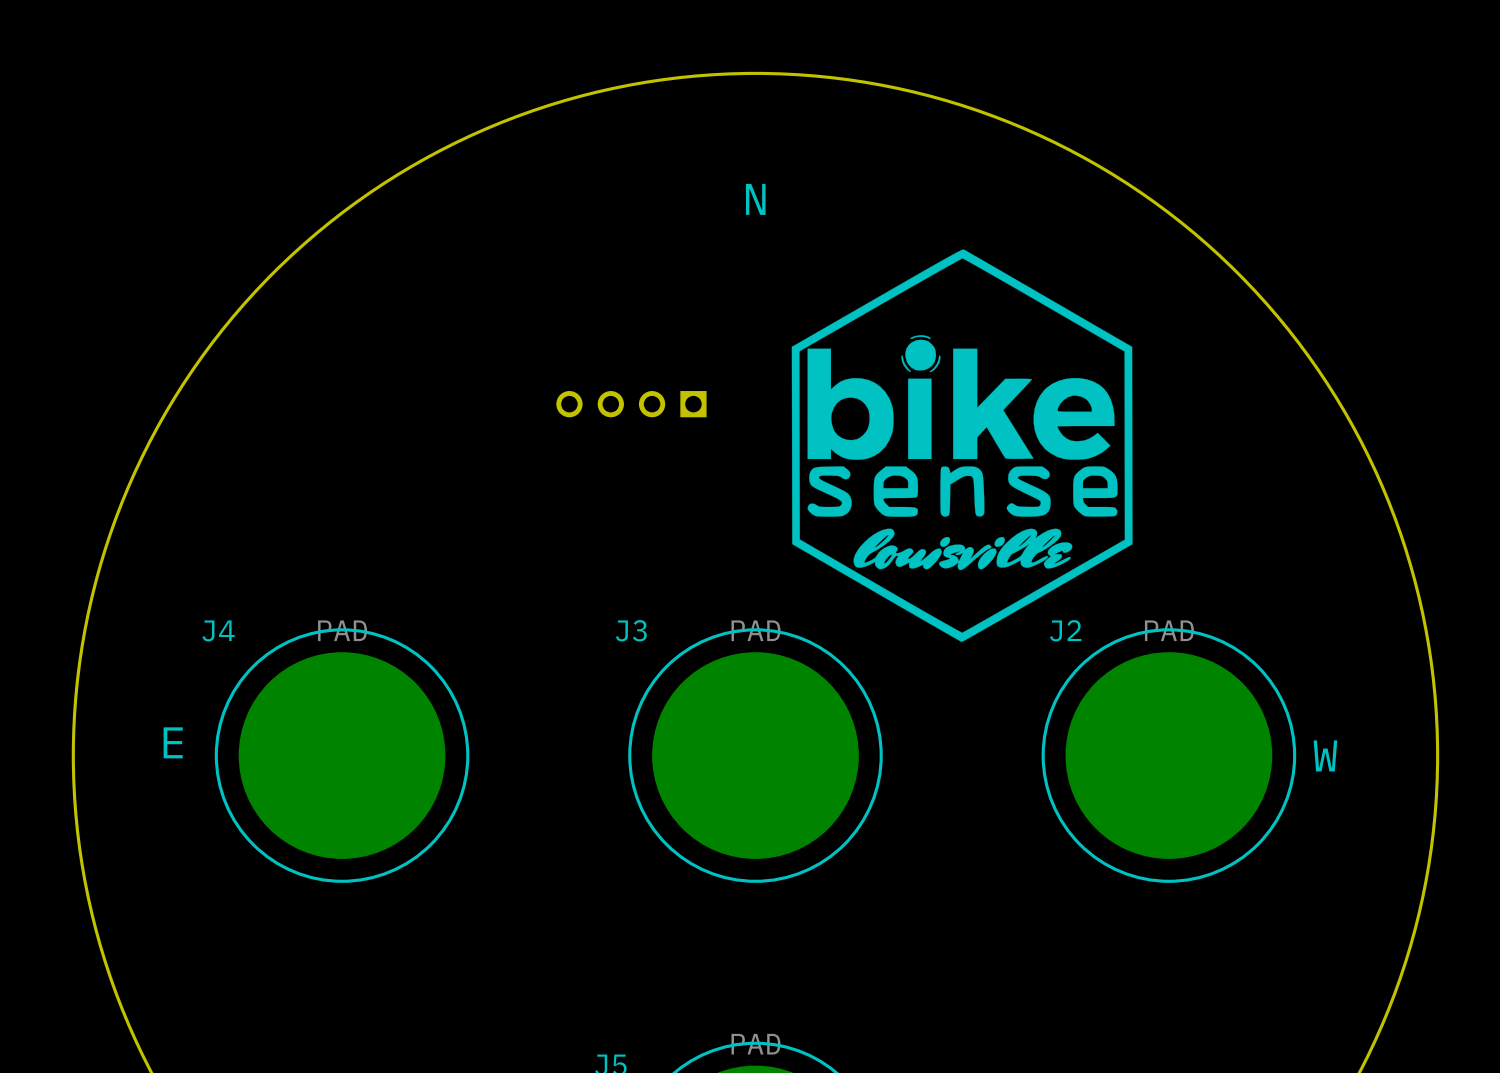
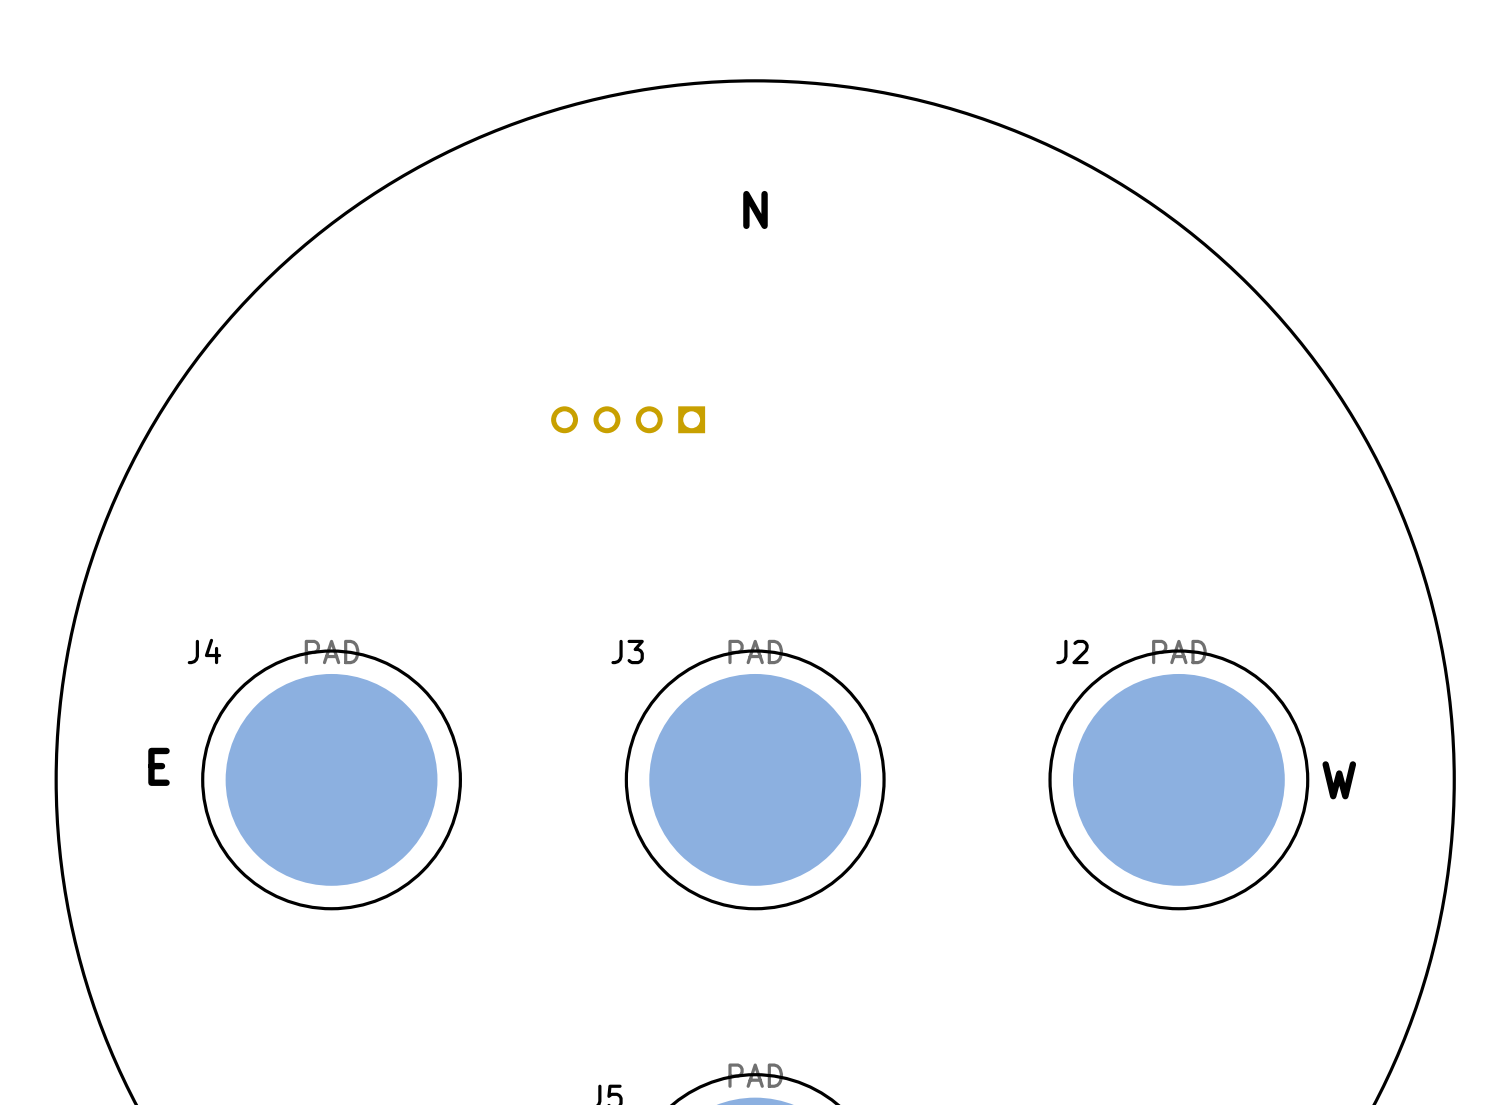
drawing: [791, 249, 1133, 643] -> none

